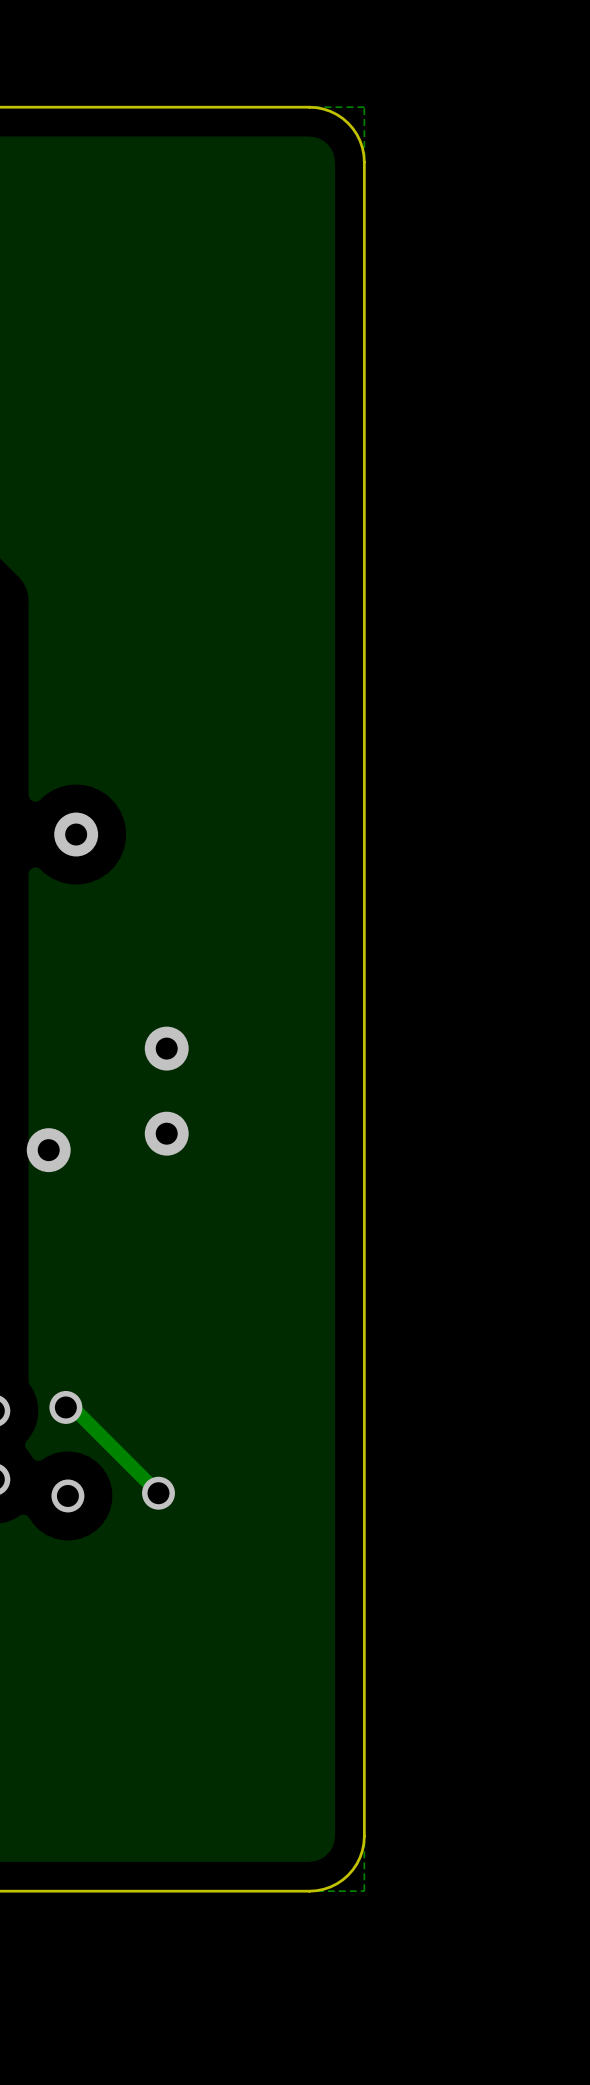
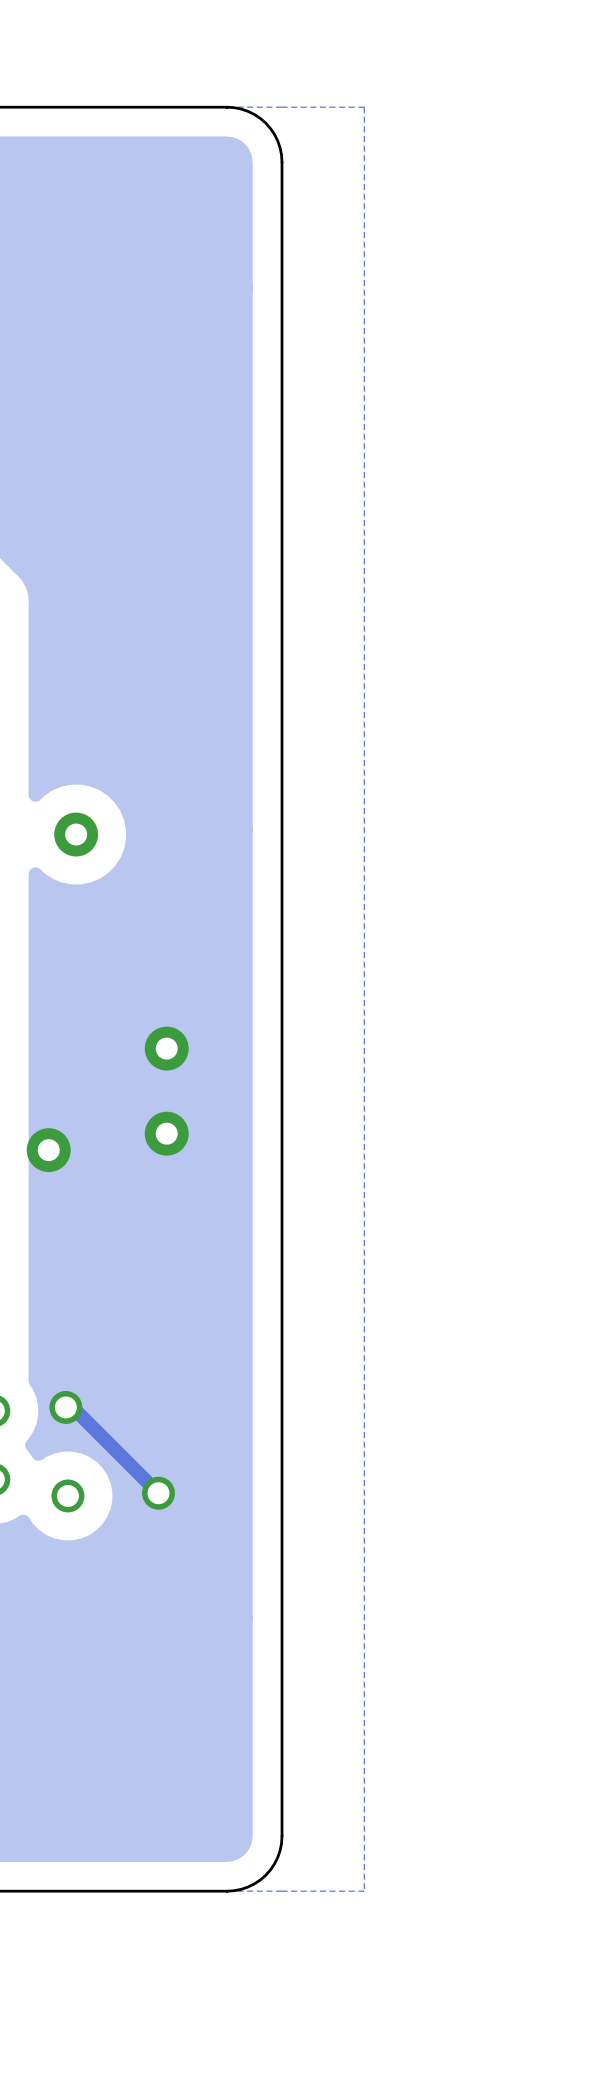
board edge: (227, 107) (309, 107) (330, 111) (342, 118) (353, 128) (360, 141) (364, 162) (363, 1843) (360, 1857) (353, 1869) (342, 1879) (330, 1887) (309, 1891) (227, 1891) -> (227, 107) (248, 111) (265, 123) (277, 141) (282, 162) (282, 1836) (277, 1857) (265, 1875) (248, 1887) (227, 1891)

